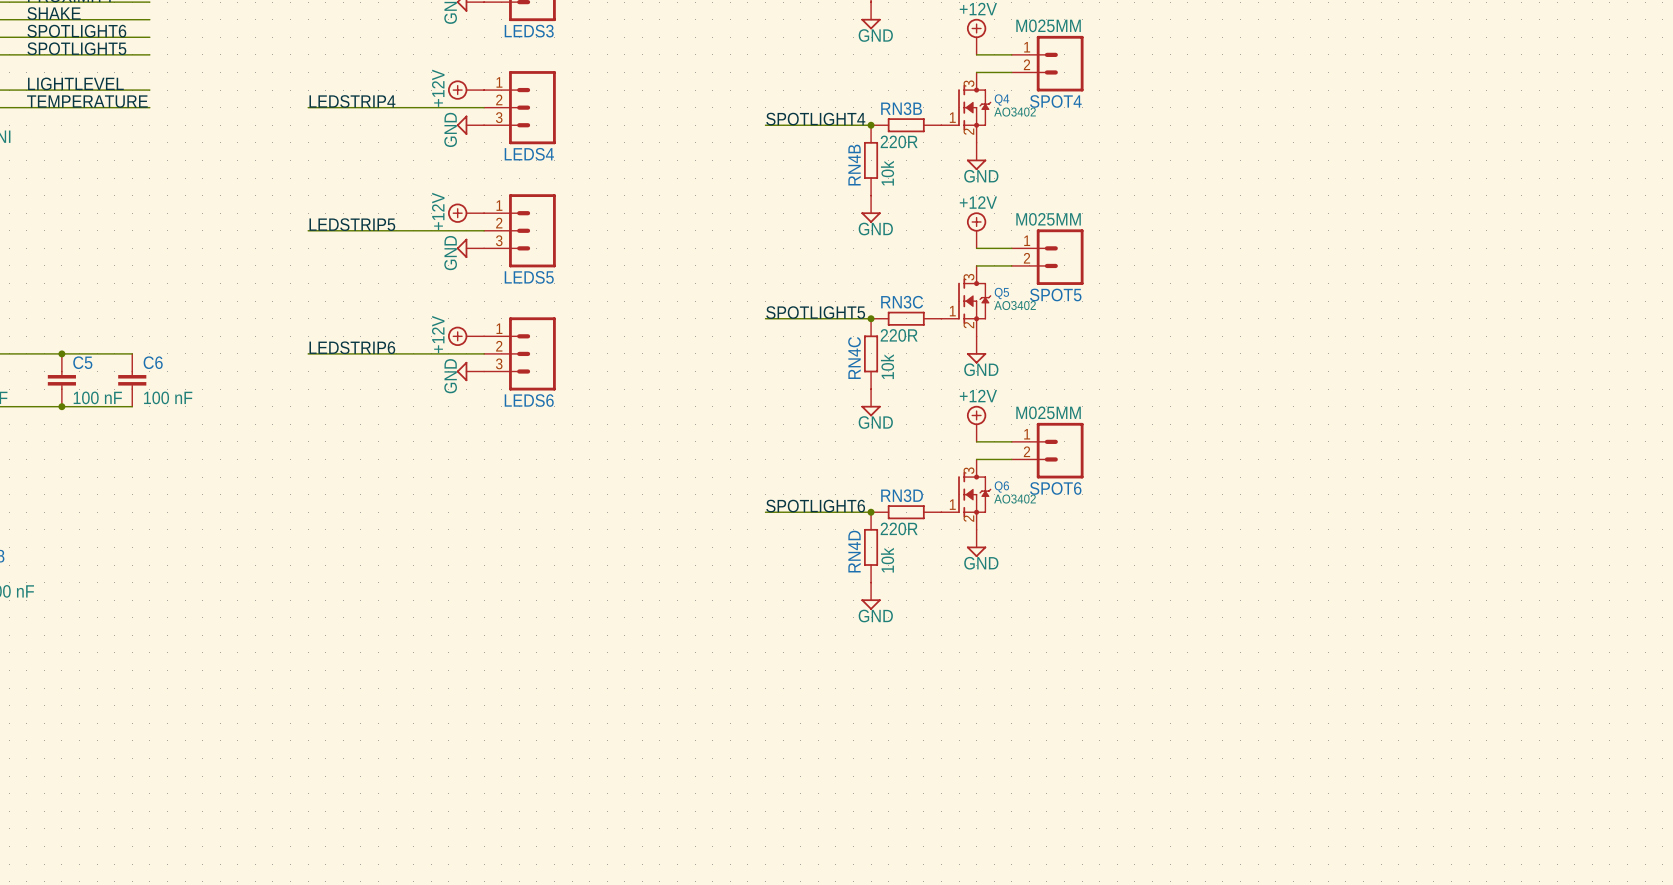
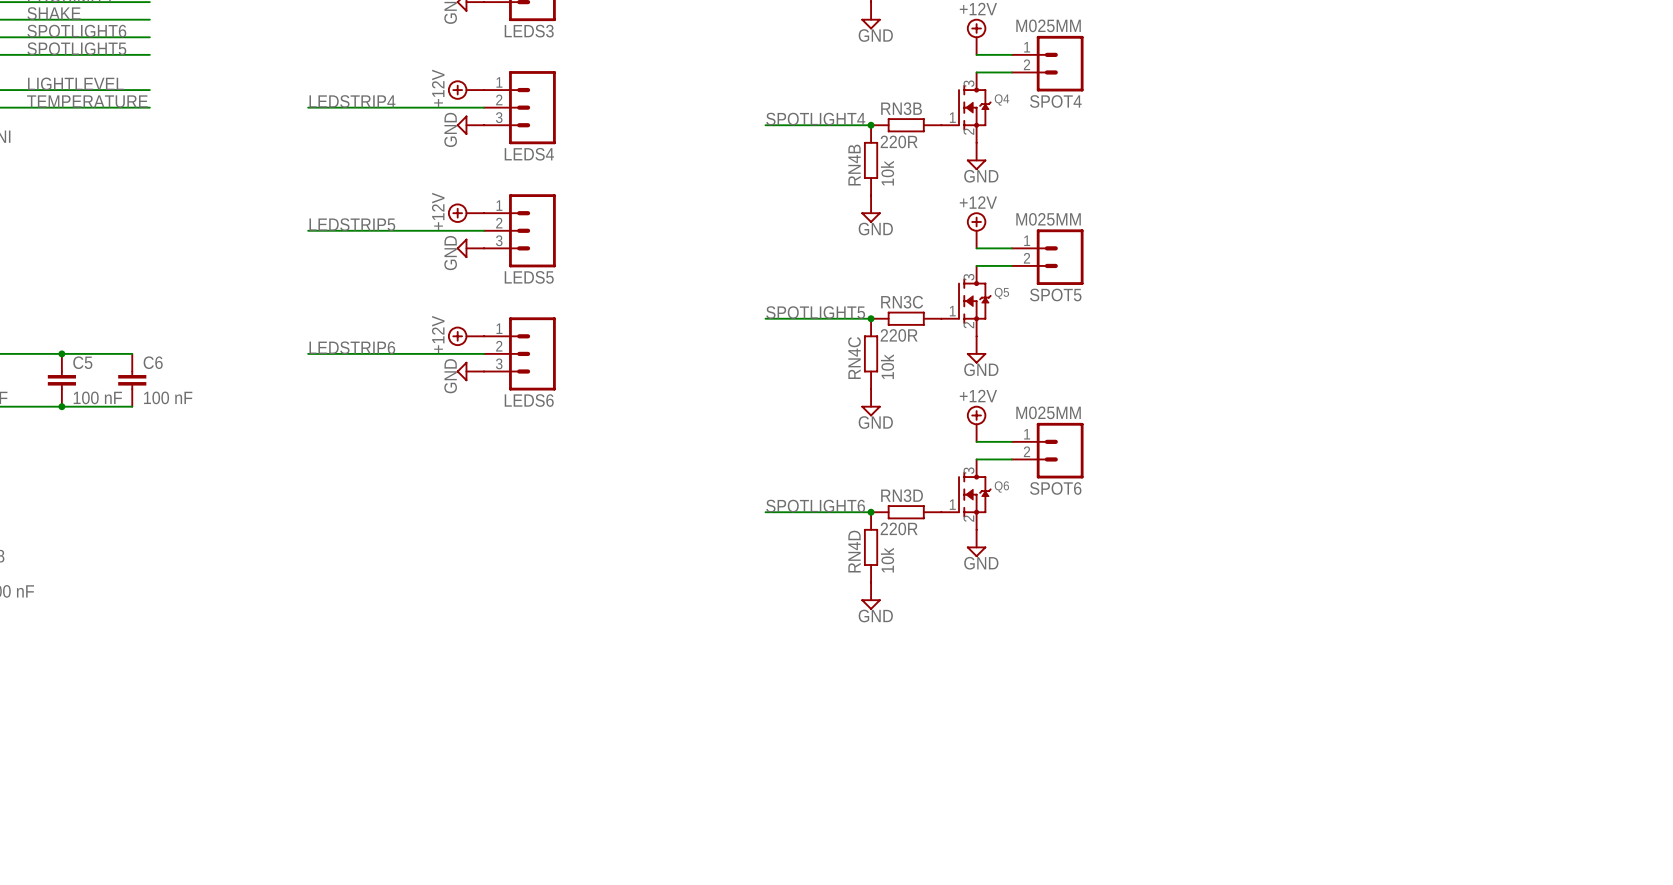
Q4 value: AO3402 (1015, 112) -> none
Q5 value: AO3402 (1015, 305) -> none
Q6 value: AO3402 (1015, 499) -> none

